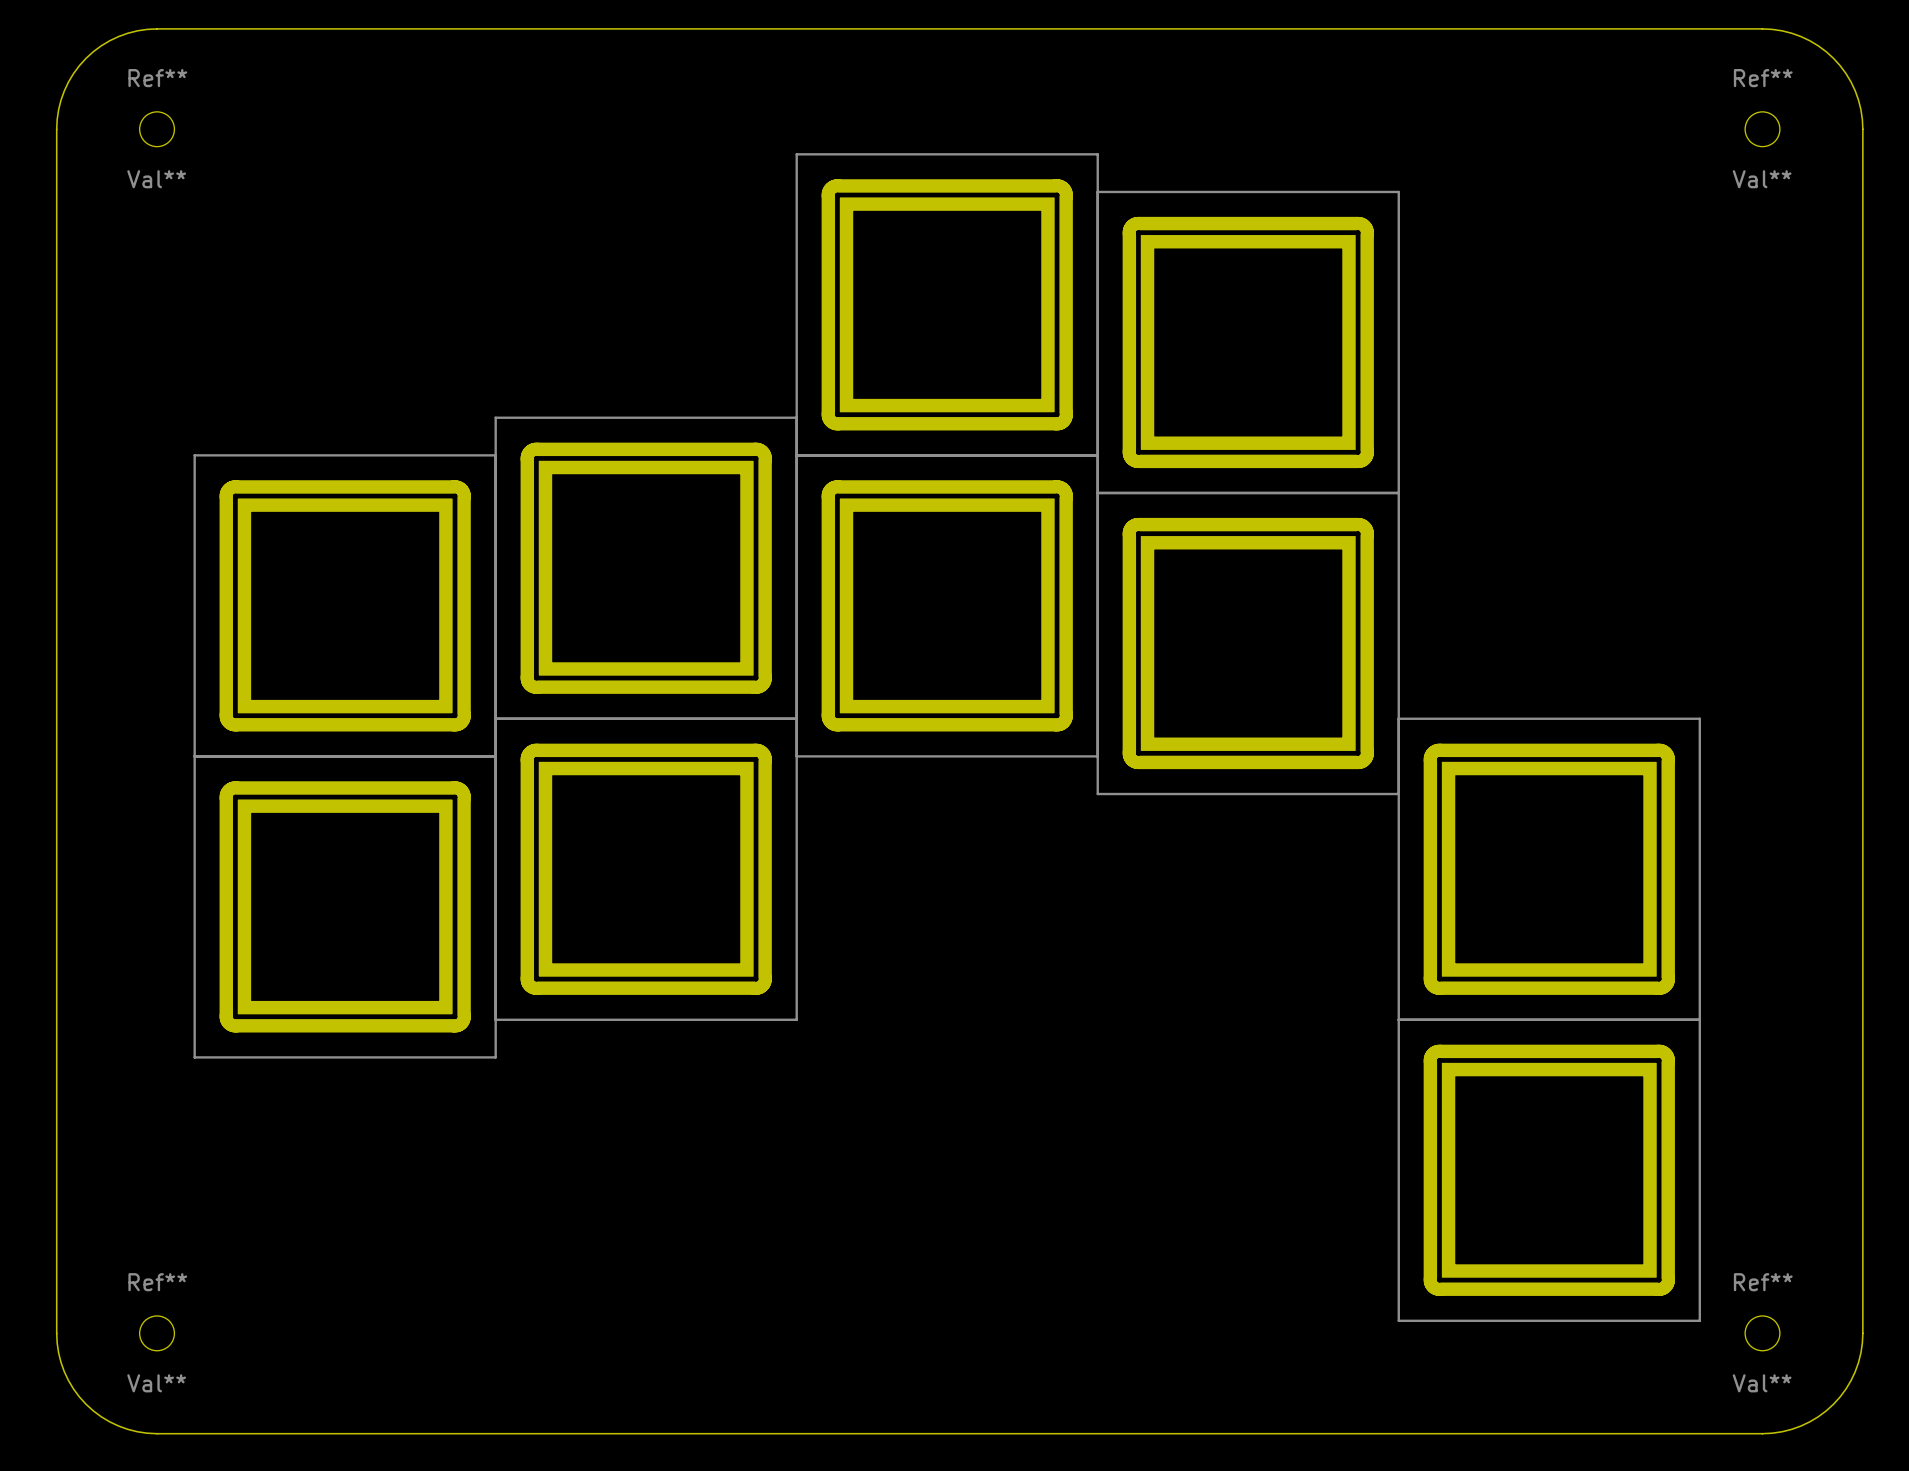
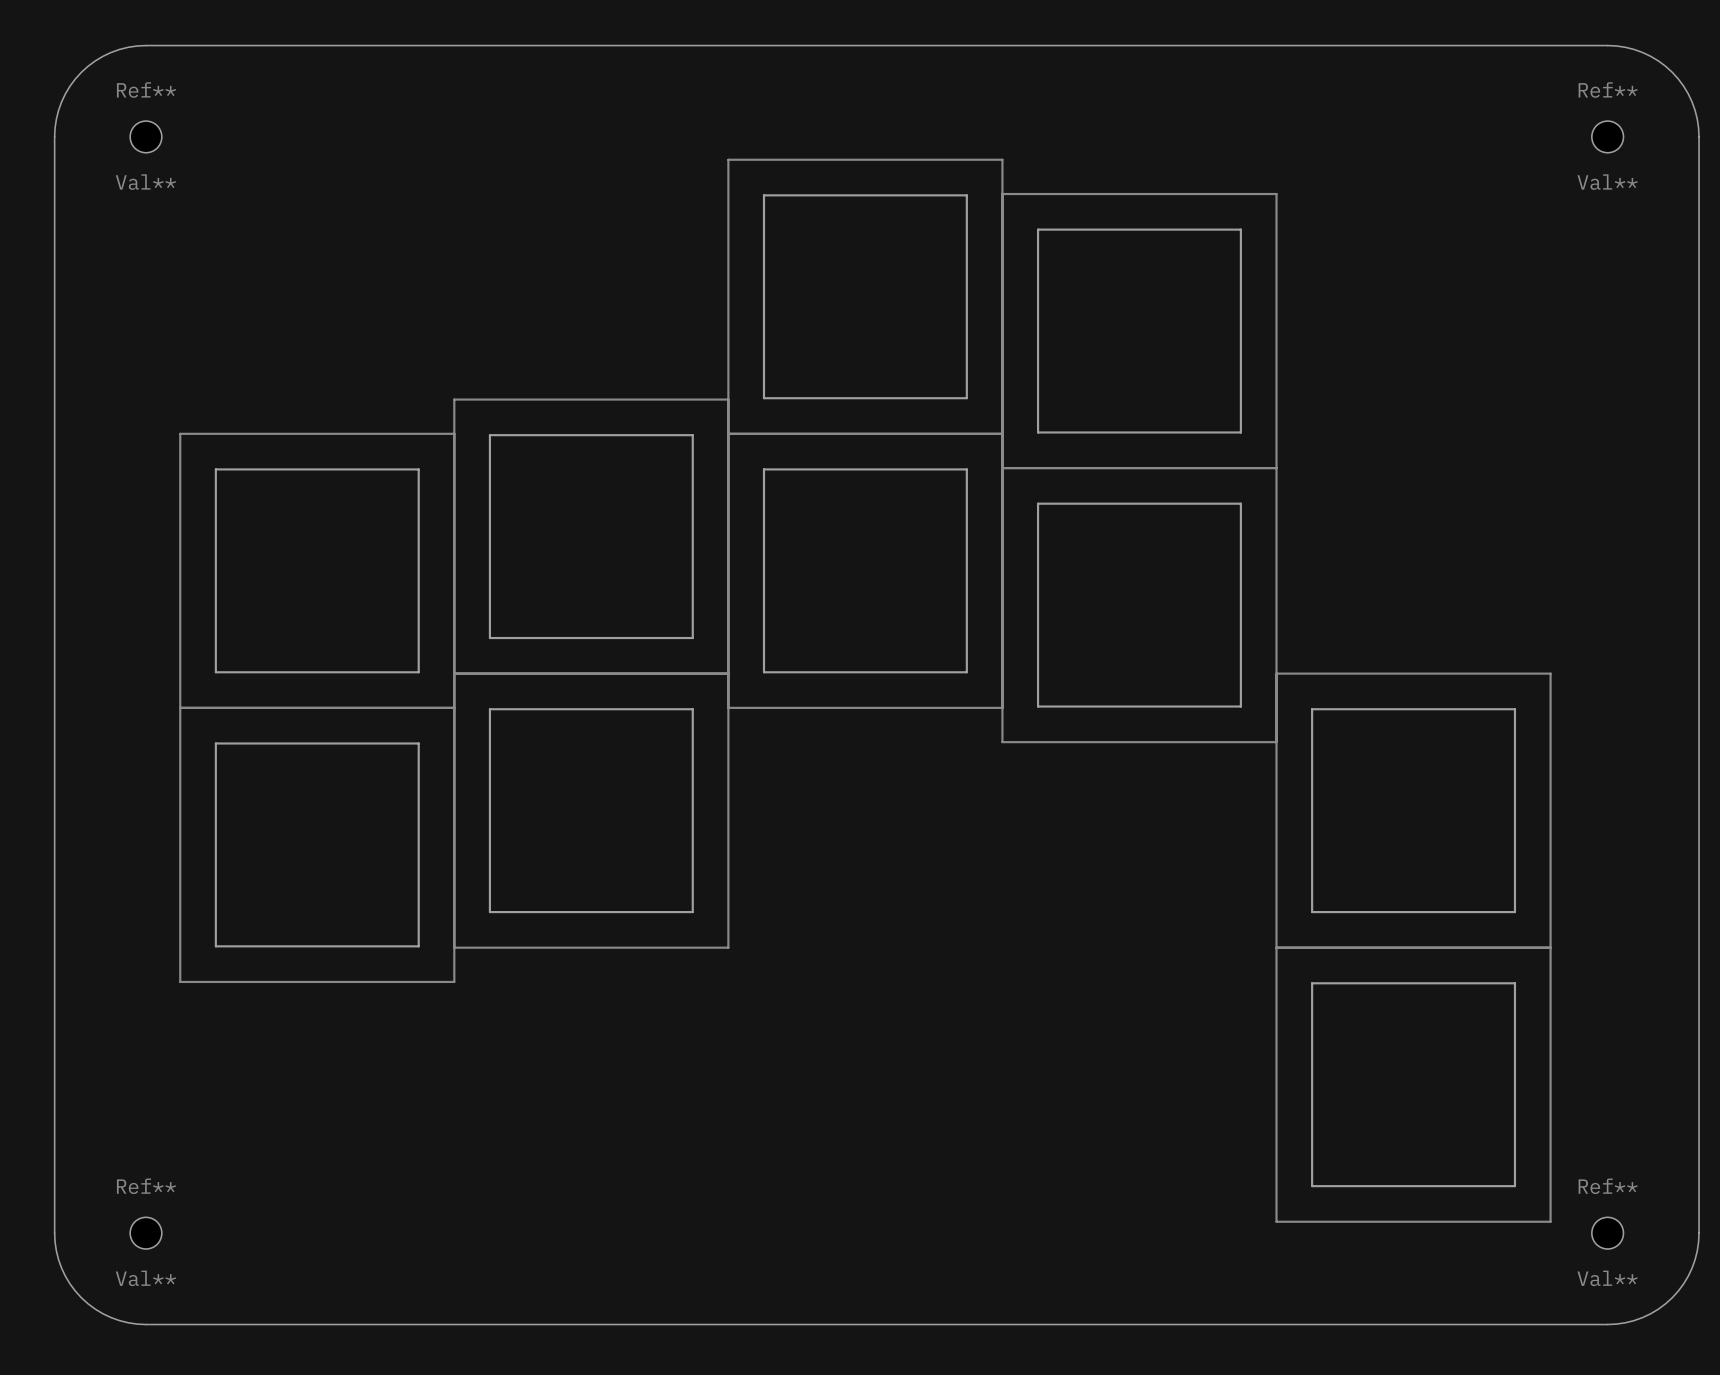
drawing: none -> [179, 158, 1552, 1223]
part: (947, 304) -> none
part: (1248, 342) -> none
part: (646, 568) -> none
part: (345, 605) -> none
part: (947, 605) -> none
part: (1248, 643) -> none
part: (646, 869) -> none
part: (1549, 869) -> none
part: (345, 906) -> none
part: (1549, 1170) -> none

